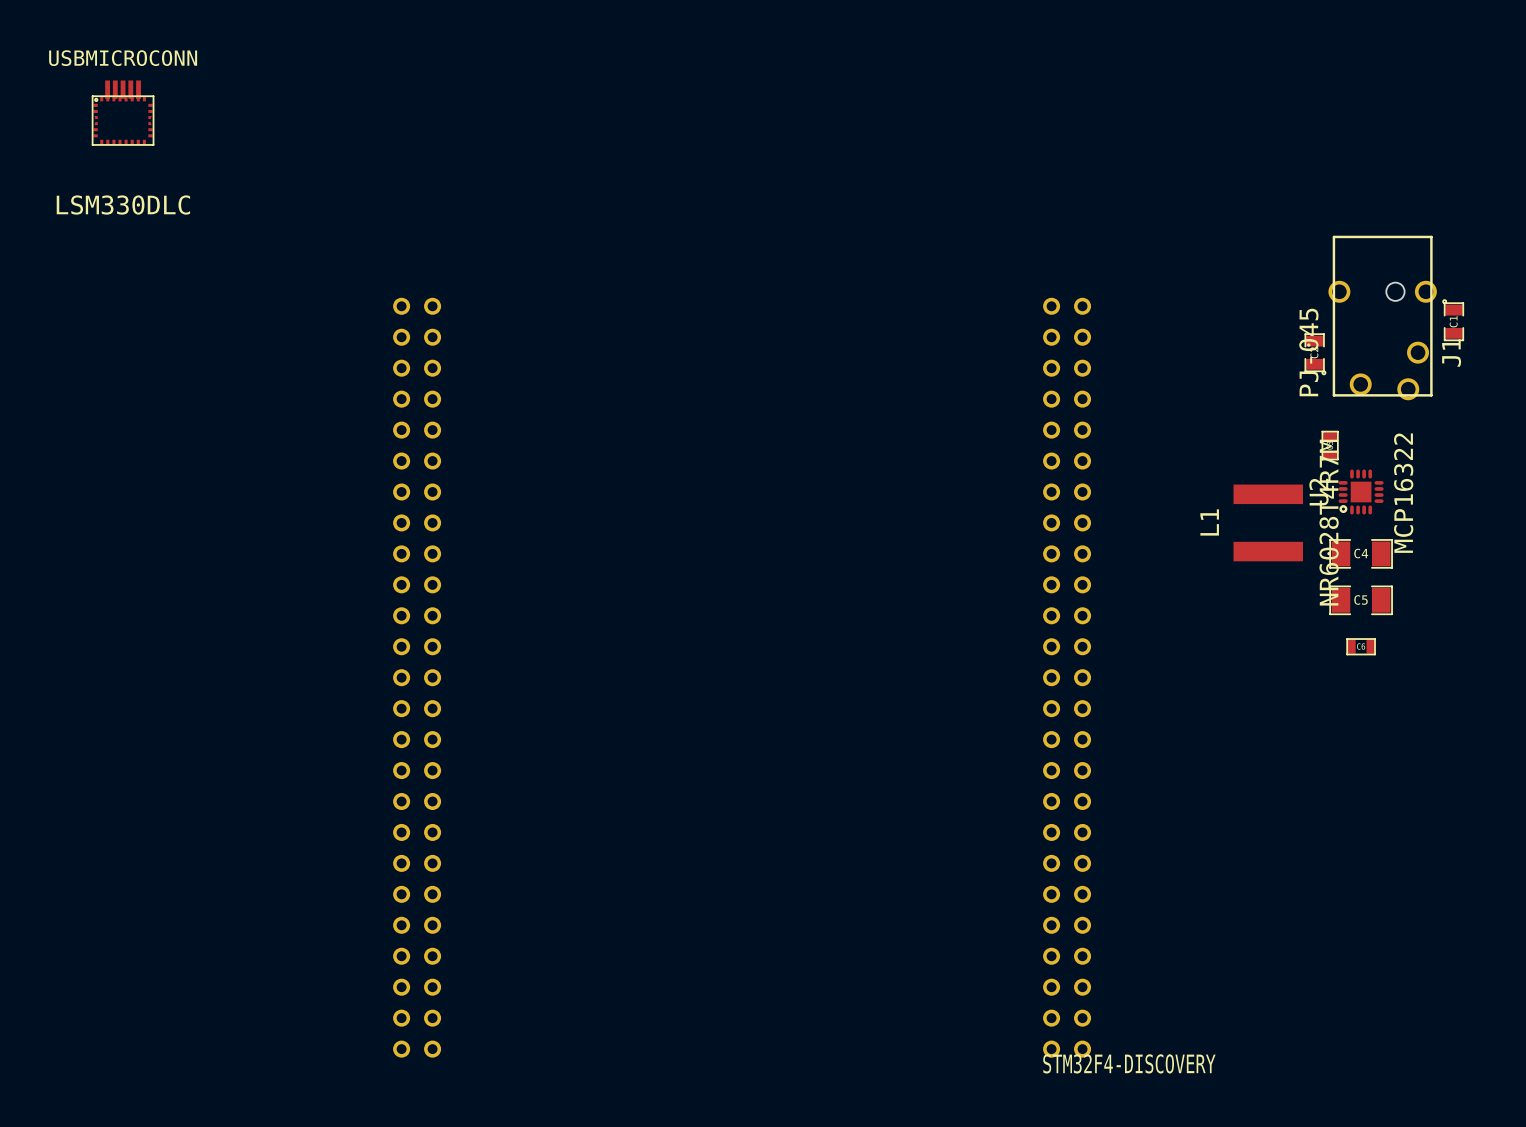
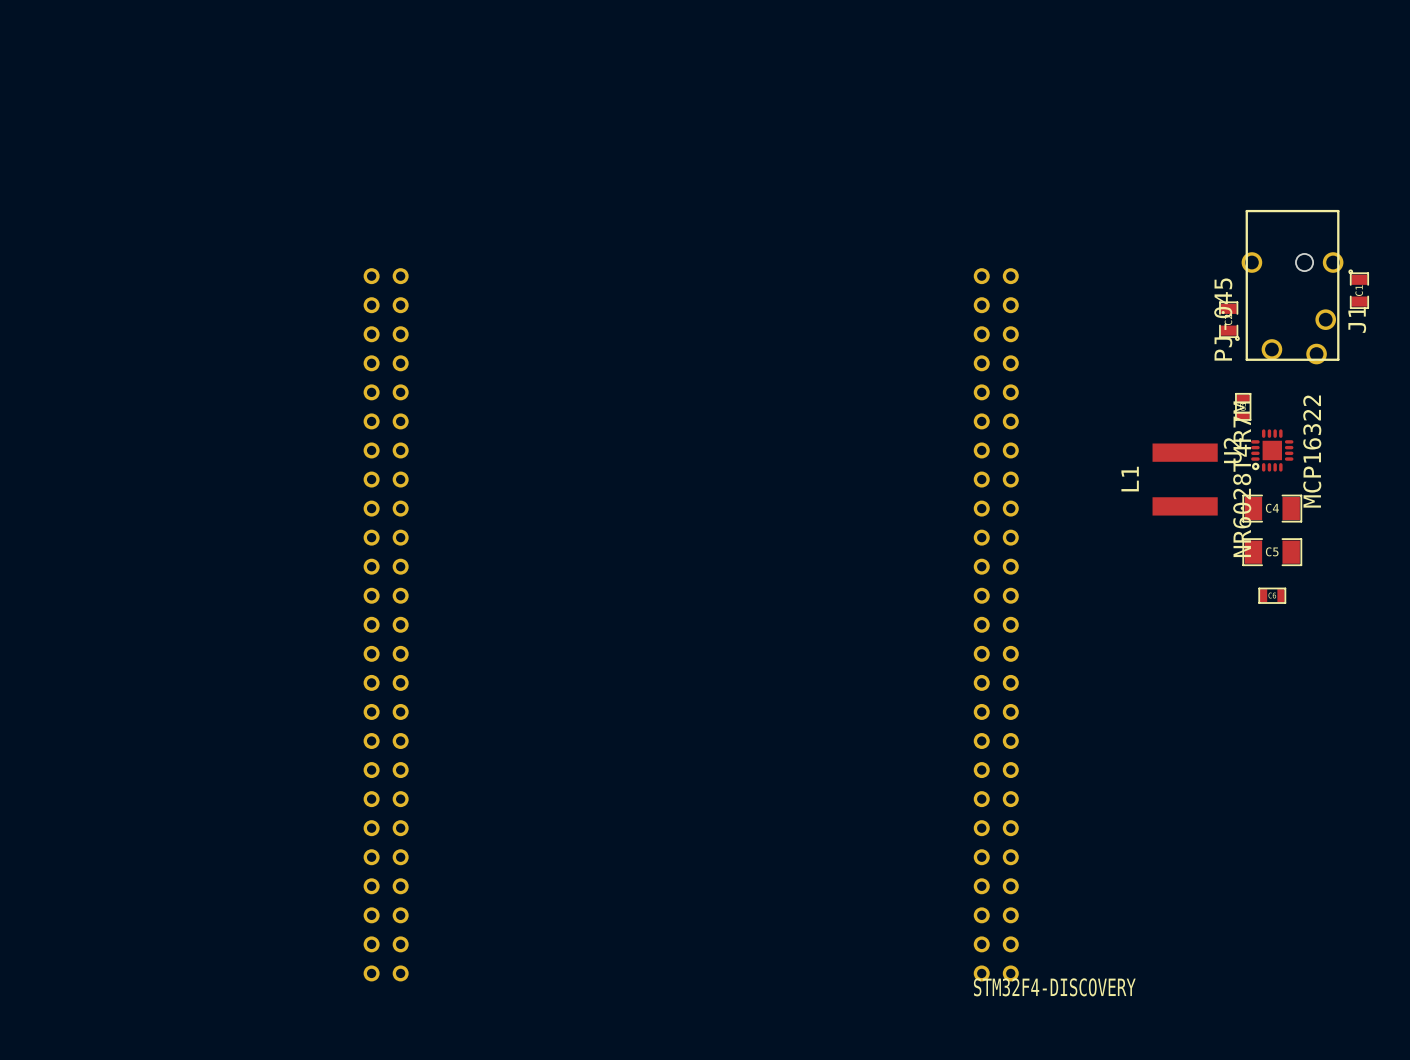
USBMICROCONN: (123, 103) -> none
LSM330DLC: (123, 120) -> none

